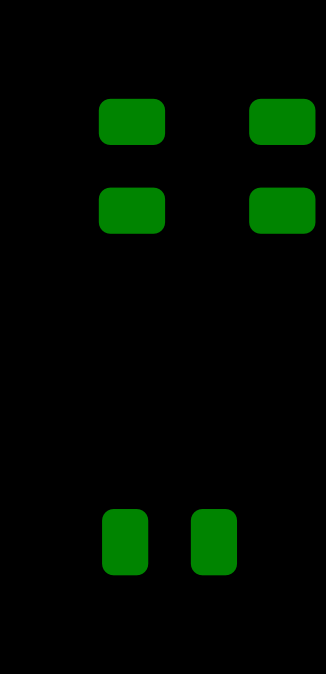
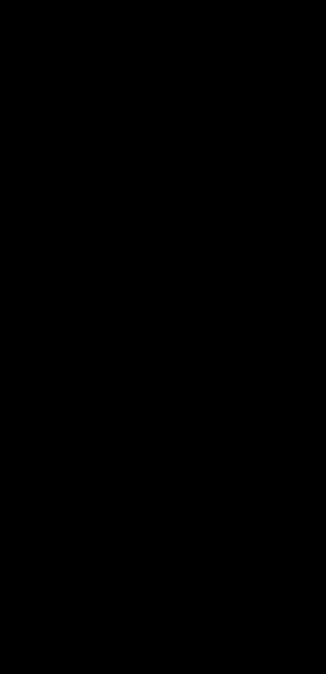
part: (131, 166) -> none
part: (282, 166) -> none
part: (169, 542) -> none

